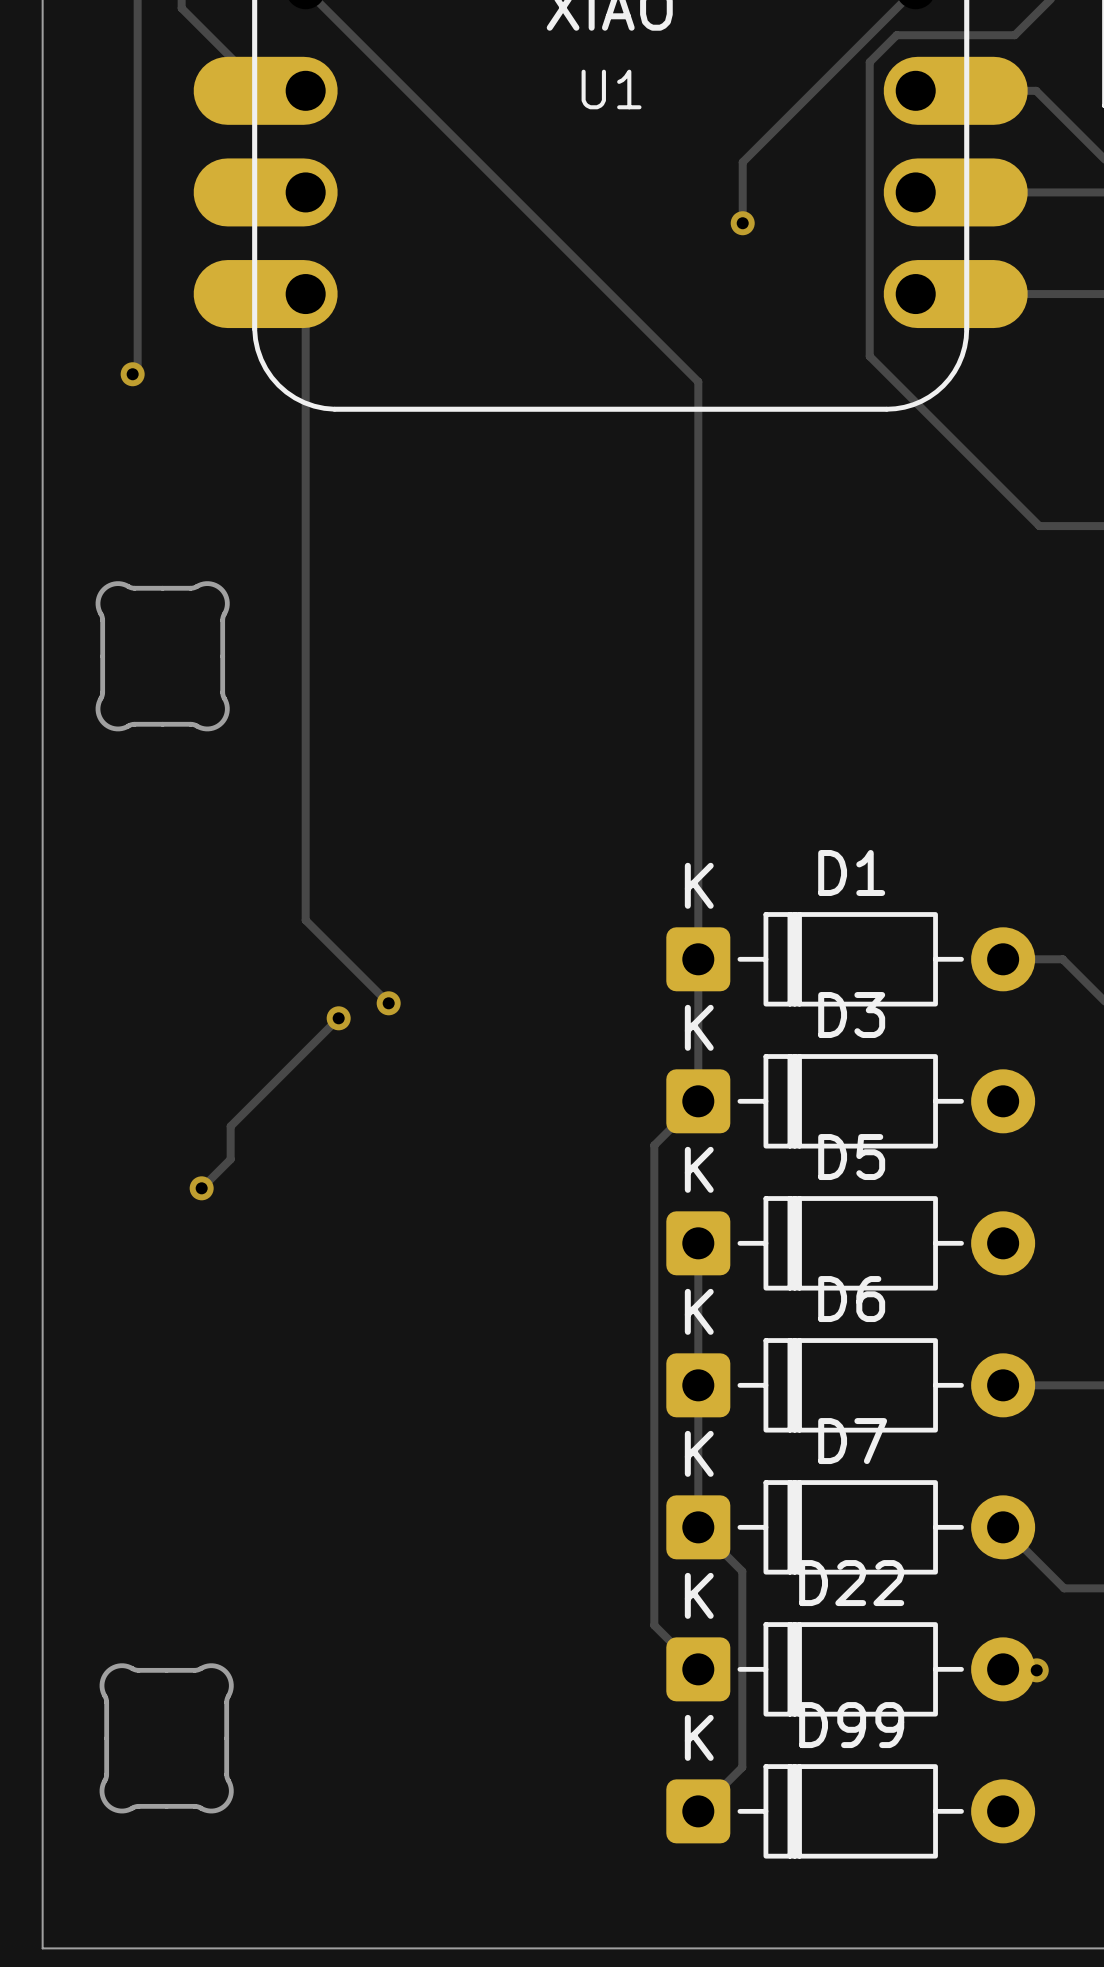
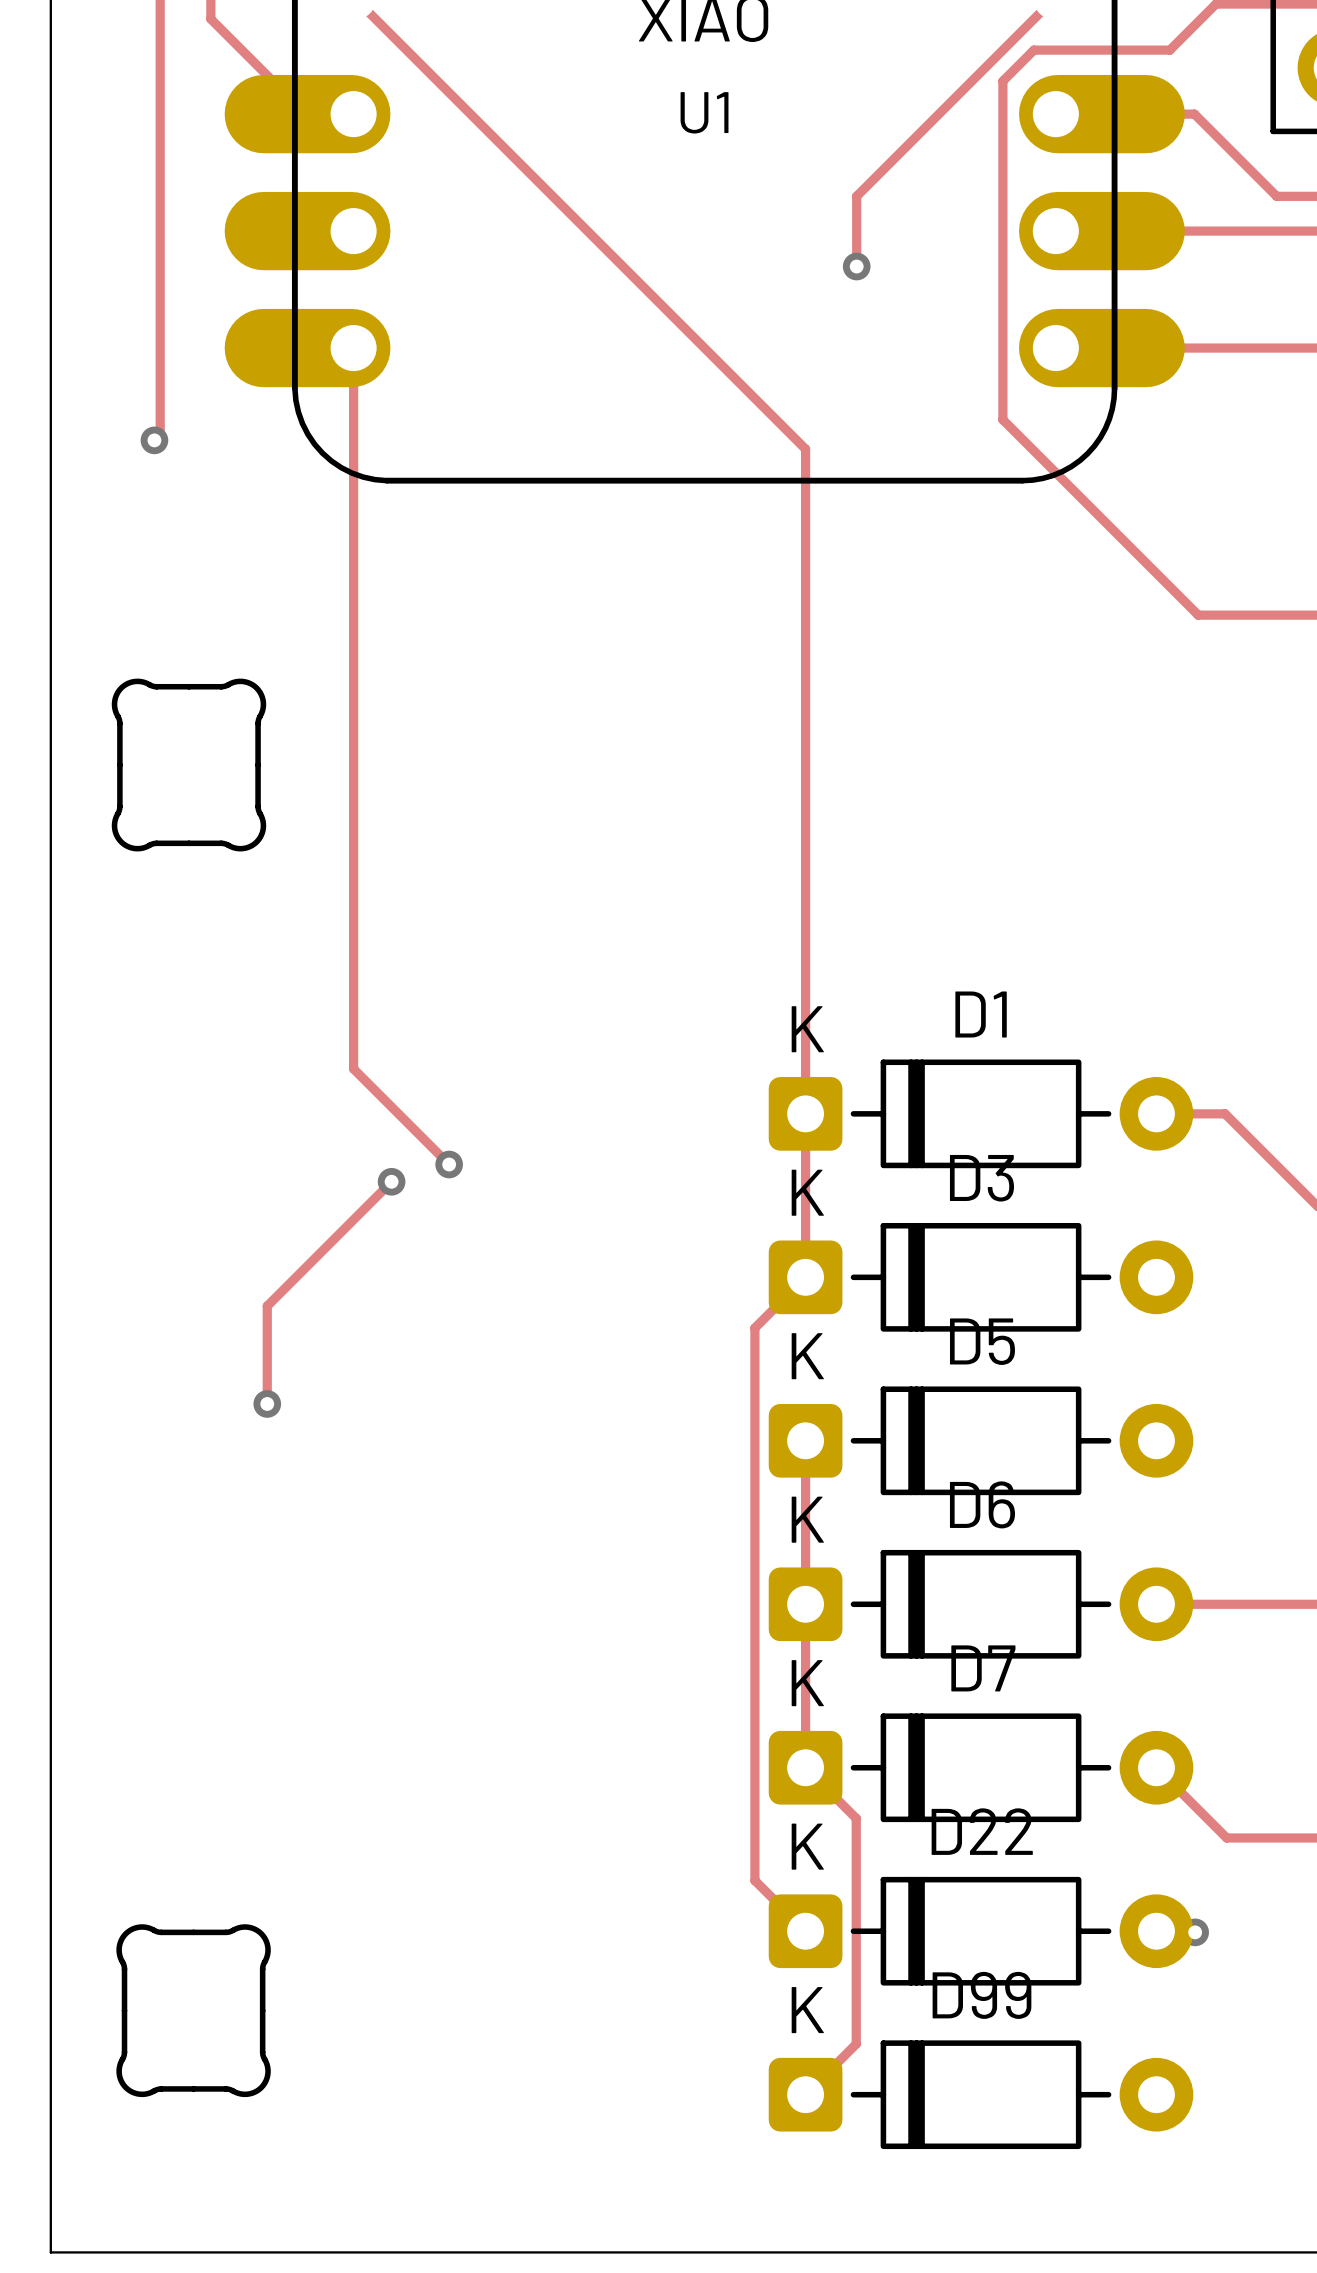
track: (230, 1159) (201, 1188) -> (267, 1344) (267, 1403)
via position: (201, 1188) -> (267, 1403)

